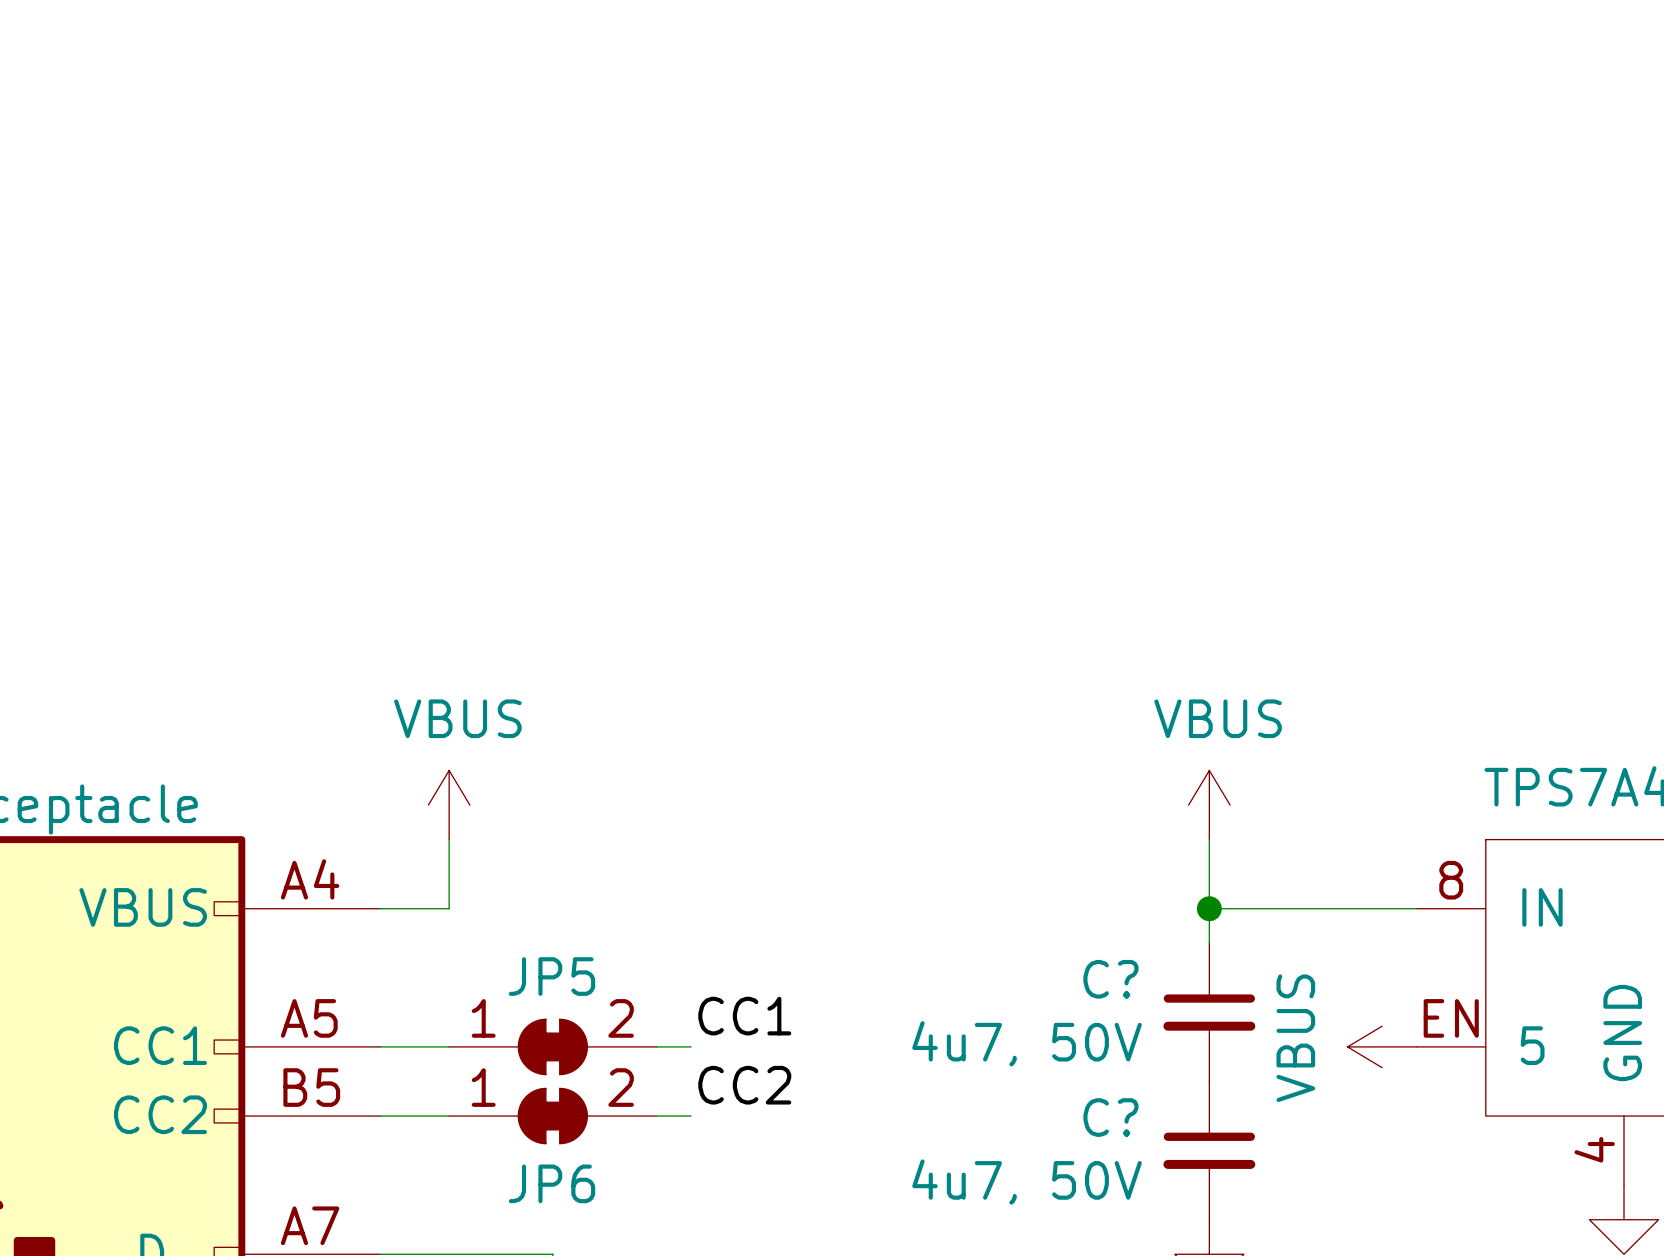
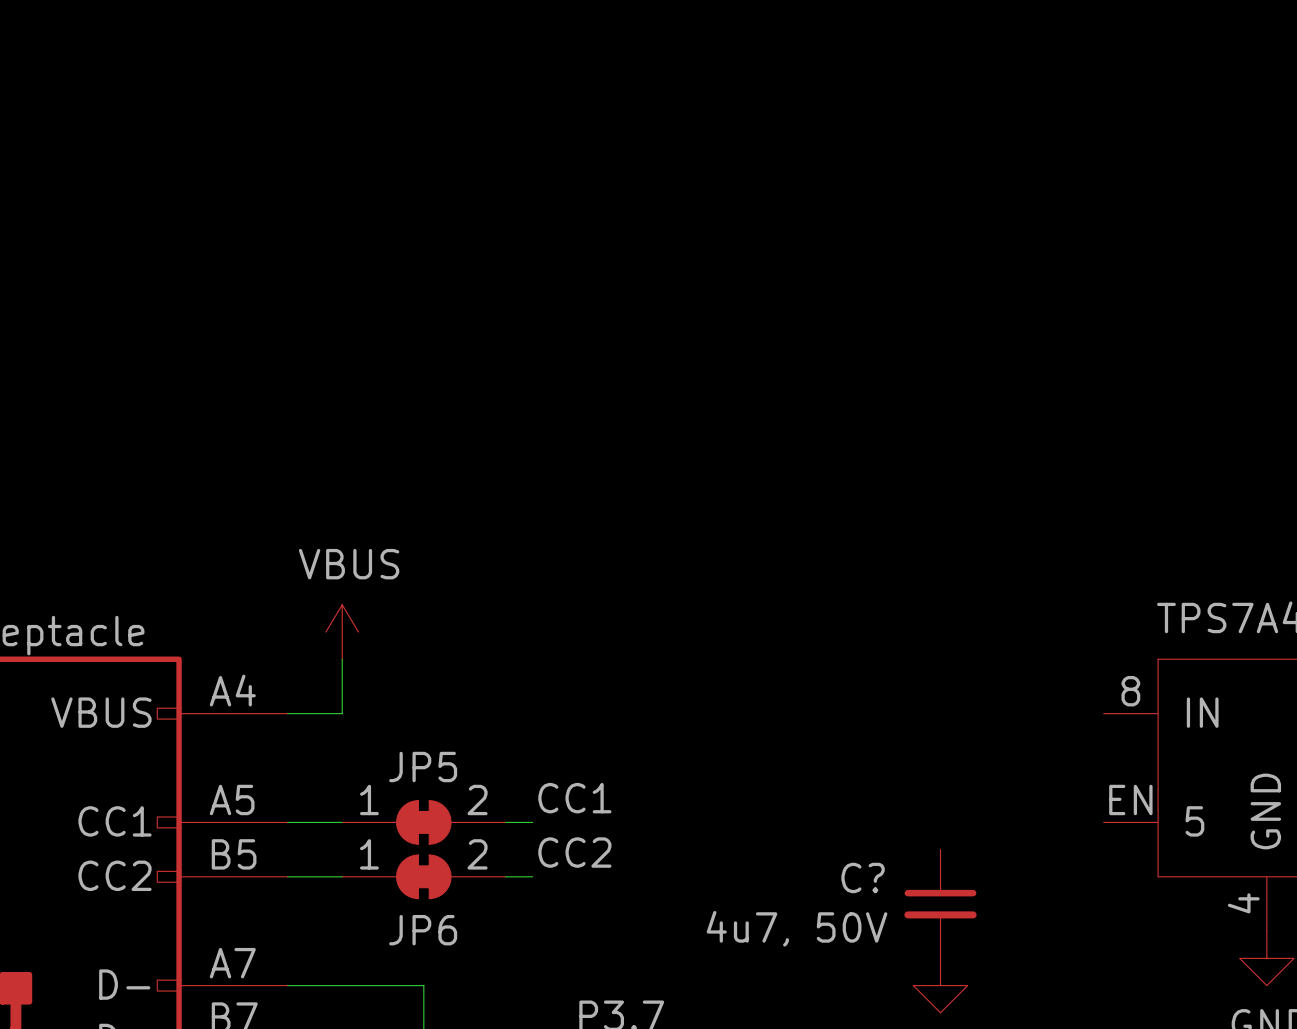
power symbol: VBUS (1209, 805) -> none
wire: (1209, 839) (1209, 943) -> none
wire: (1209, 908) (1416, 908) -> none
junction: (1209, 908) -> none
C?: 4u7, 50V (1209, 1012) -> none
power symbol: VBUS (1382, 1046) -> none

